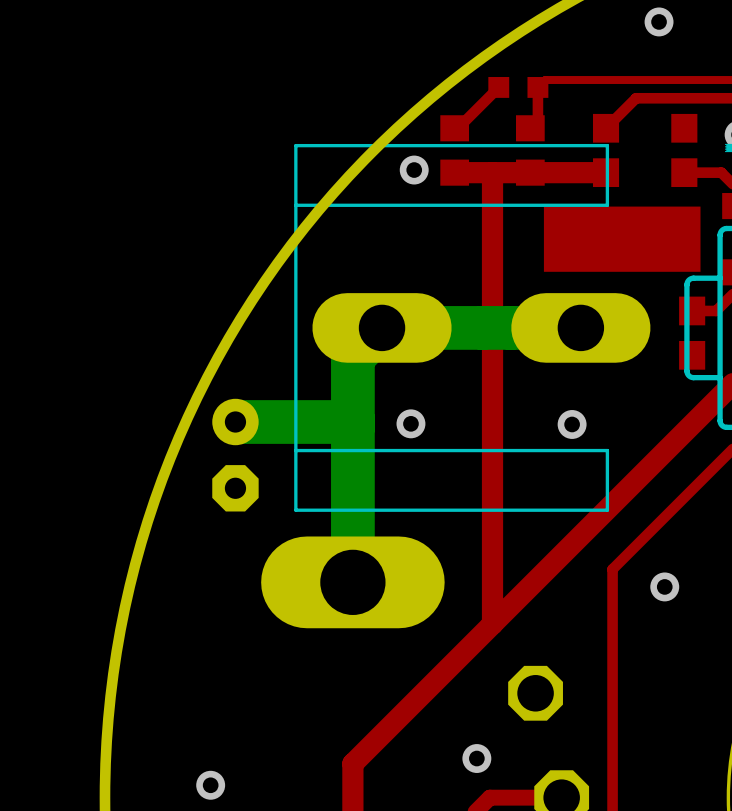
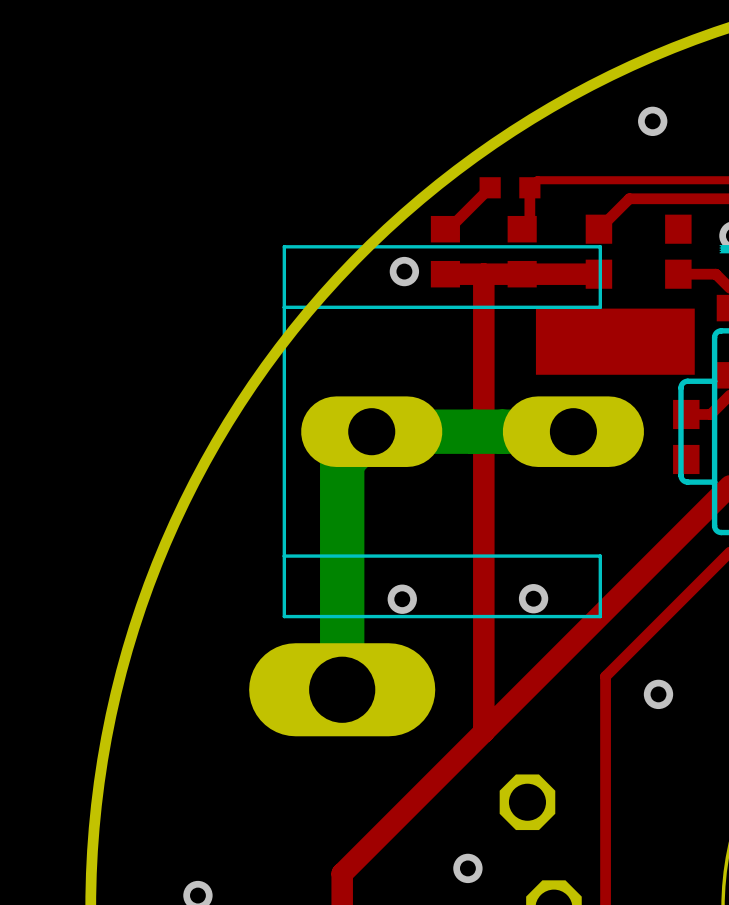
bottom track: (235, 422) (347, 422) (352, 427) -> none
via position: (410, 423) -> (402, 599)
via: (572, 424) -> none
part: (235, 455) -> none
via: none -> (533, 598)

